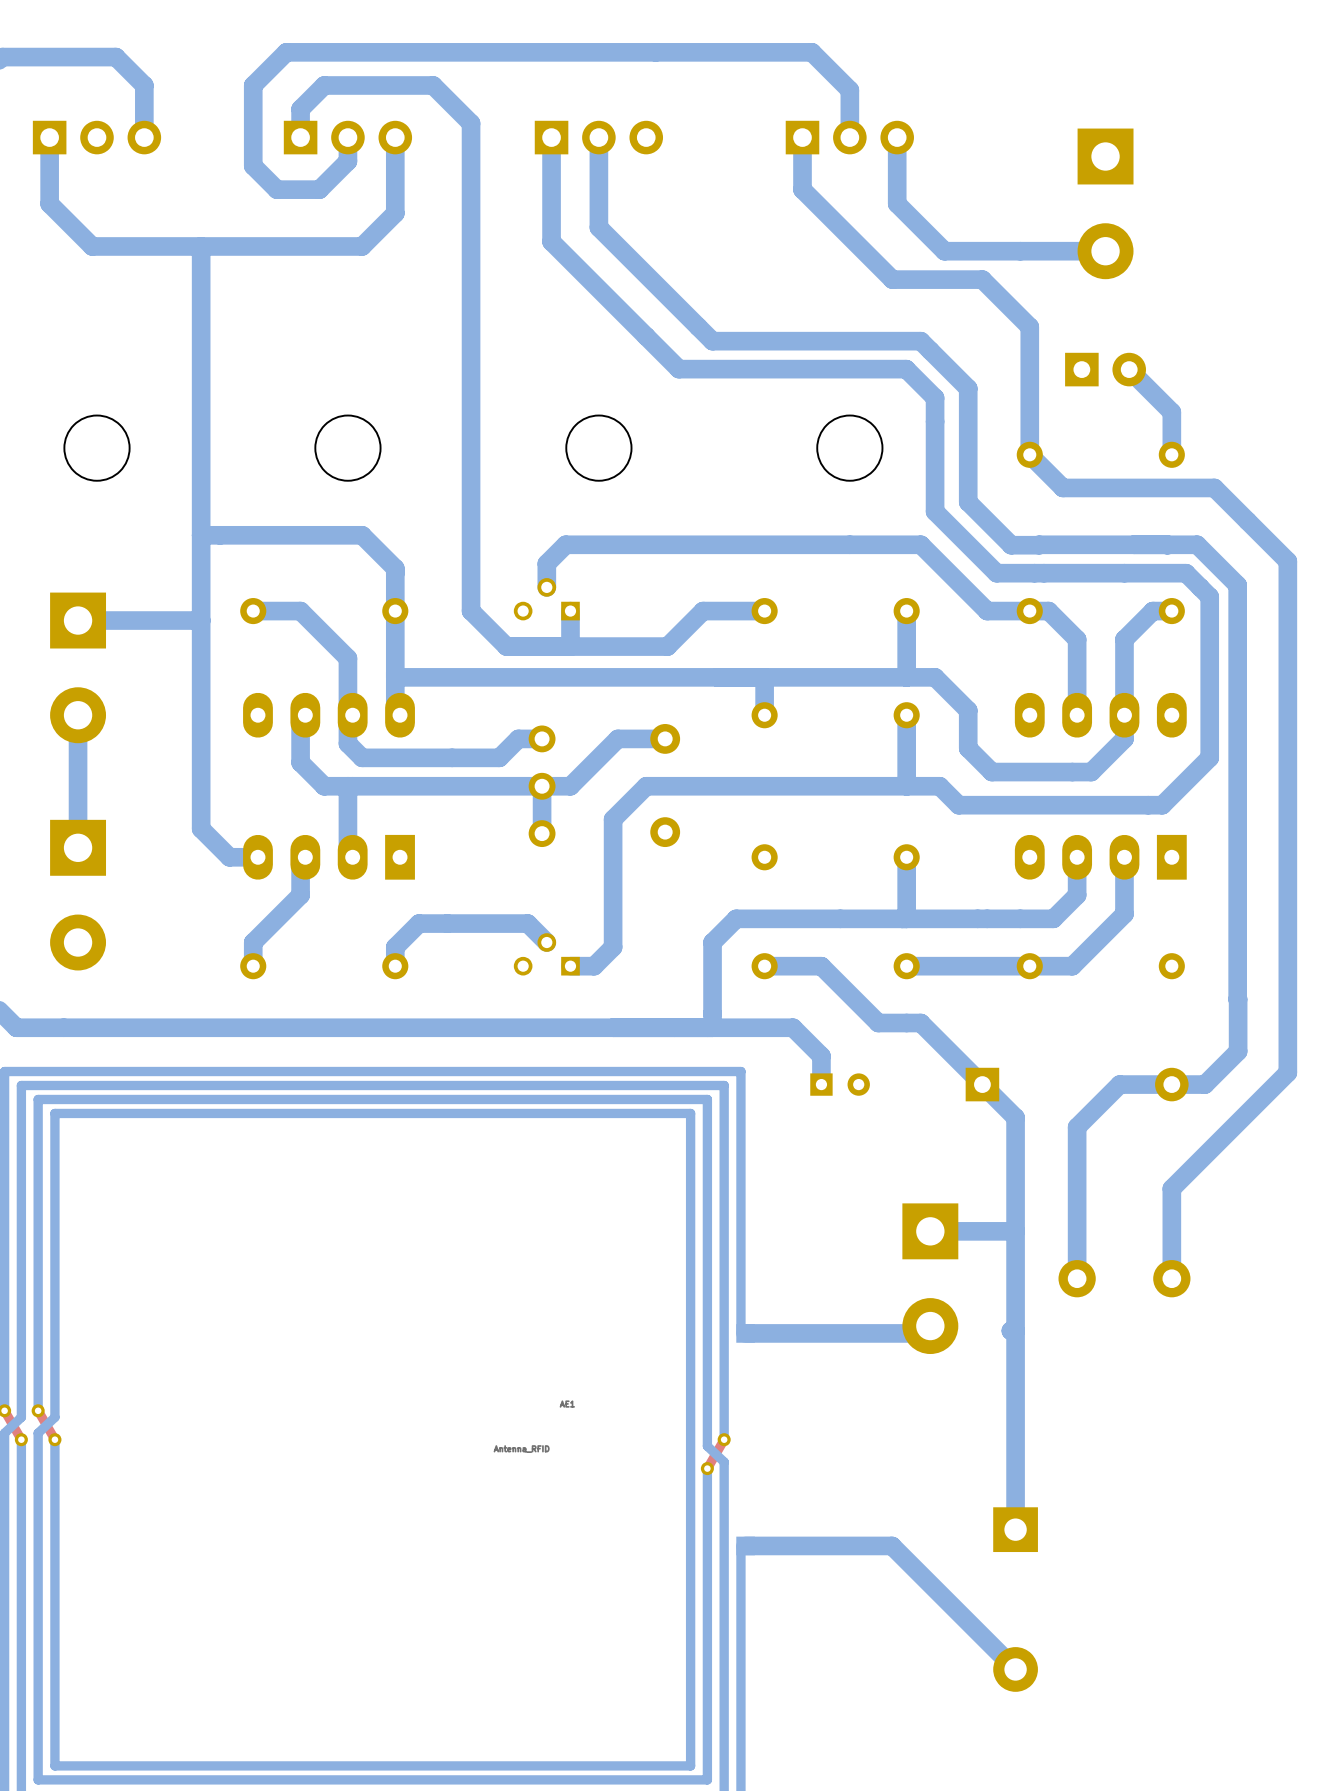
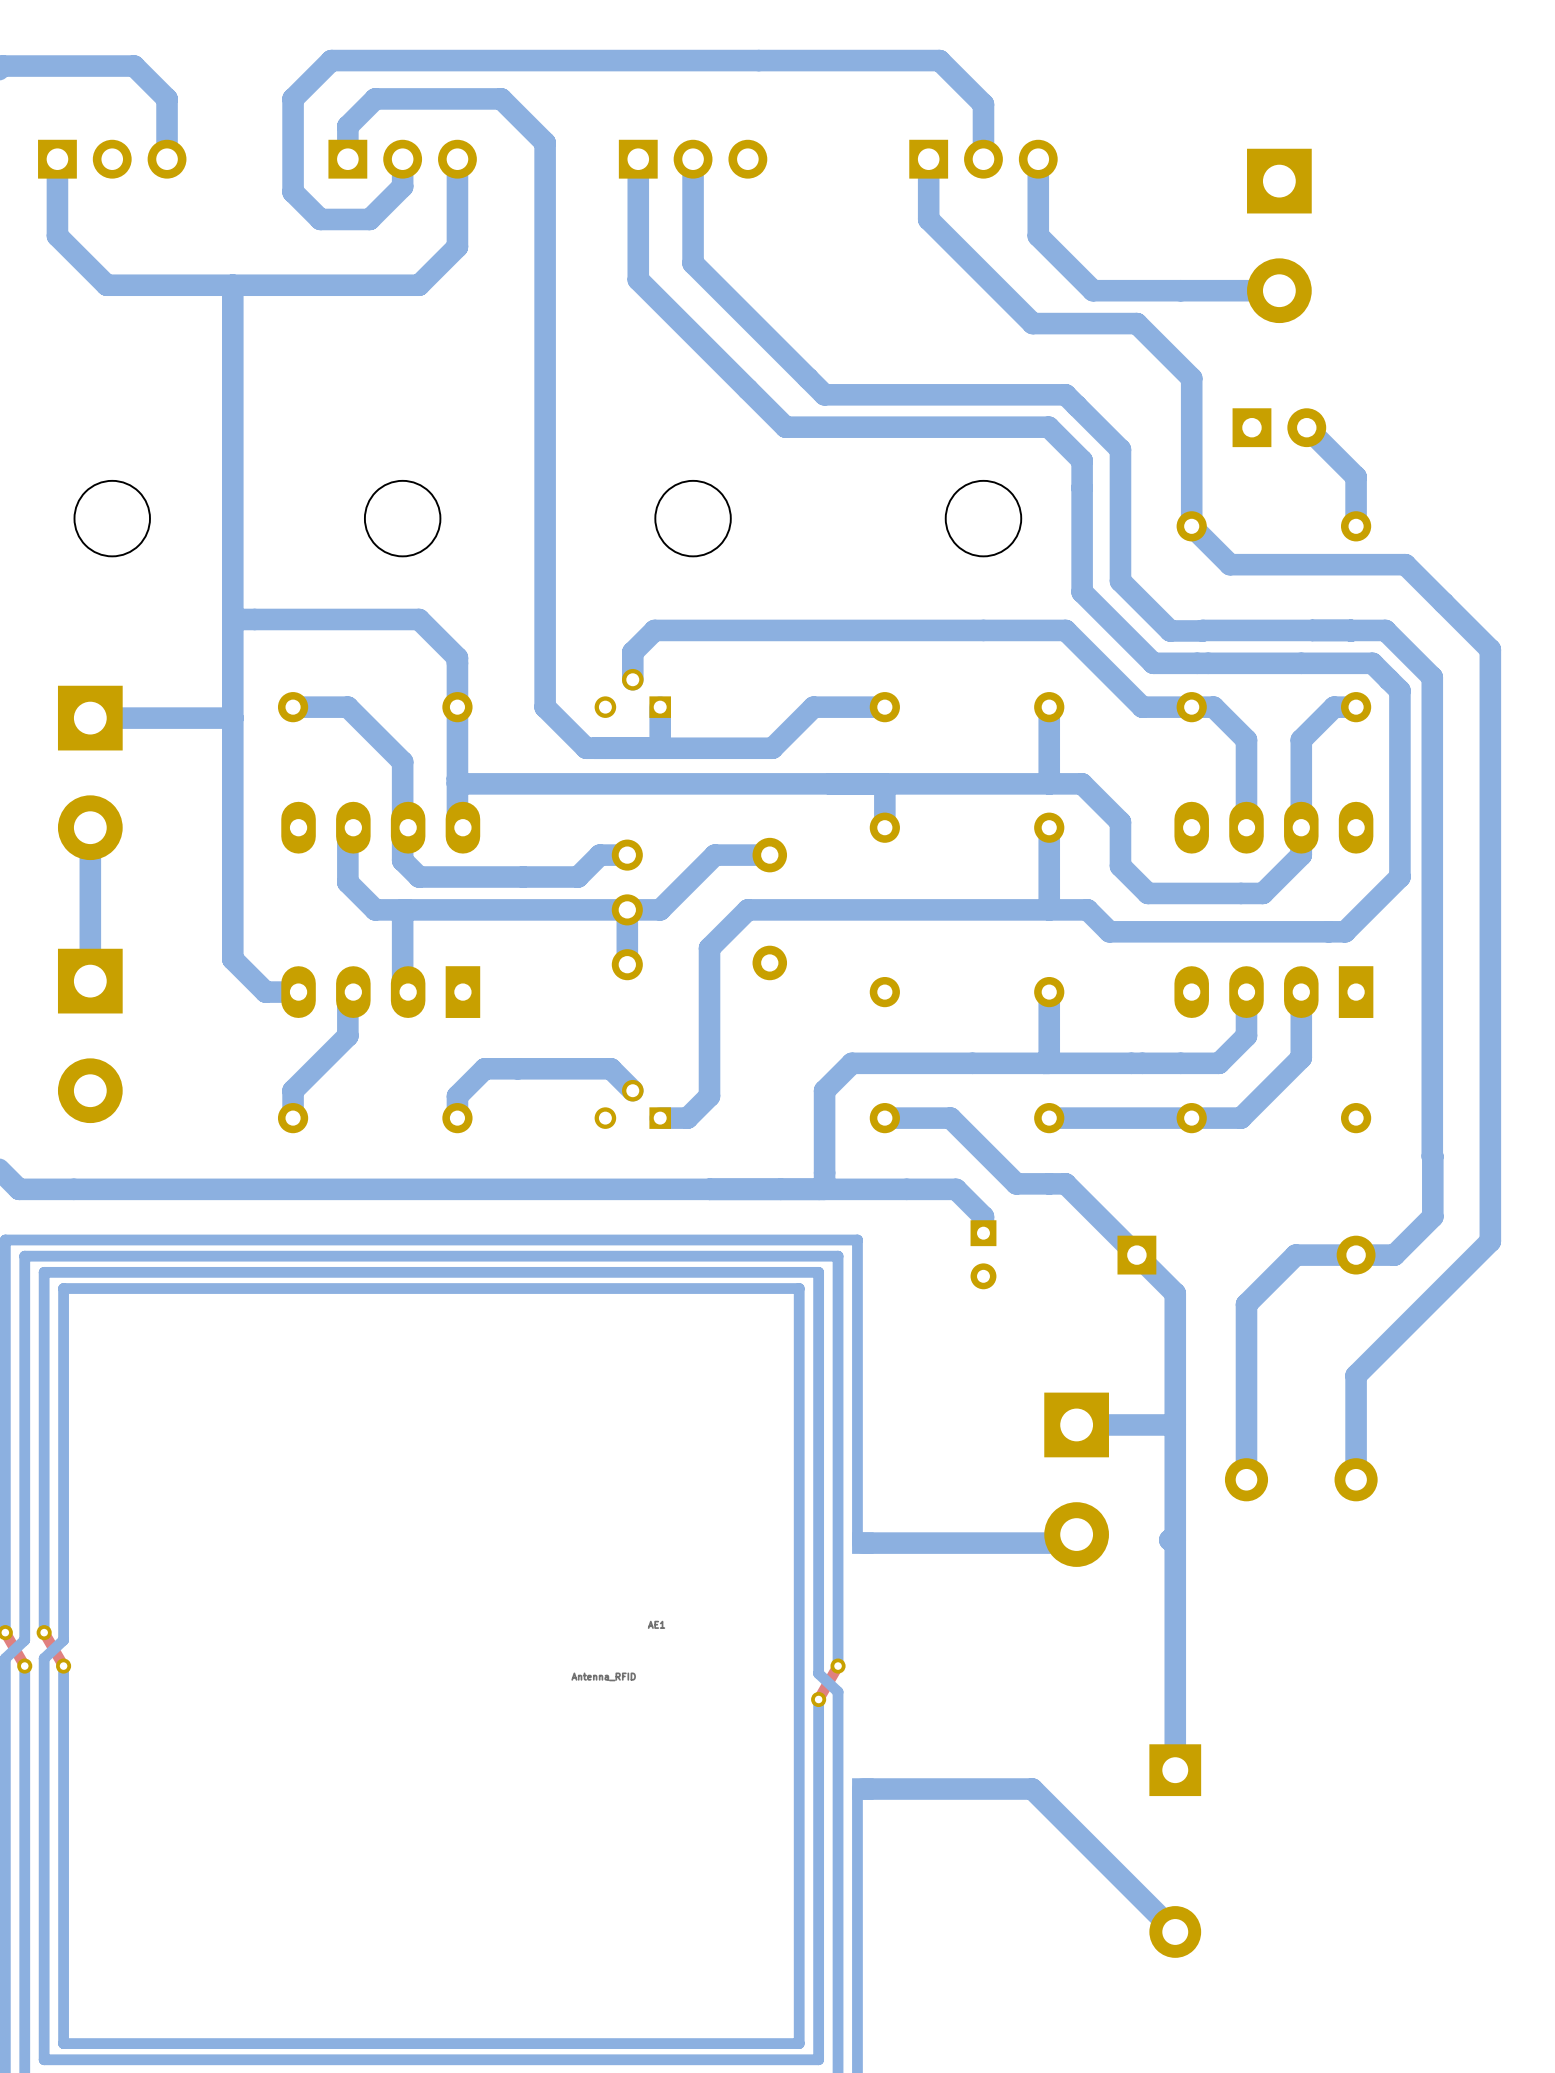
bottom track: (793, 1027) (821, 1056) (821, 1084) -> (917, 1189) (956, 1189) (983, 1216) (983, 1233)
part rotation: 0° (840, 1084) -> 90° clockwise (983, 1254)

